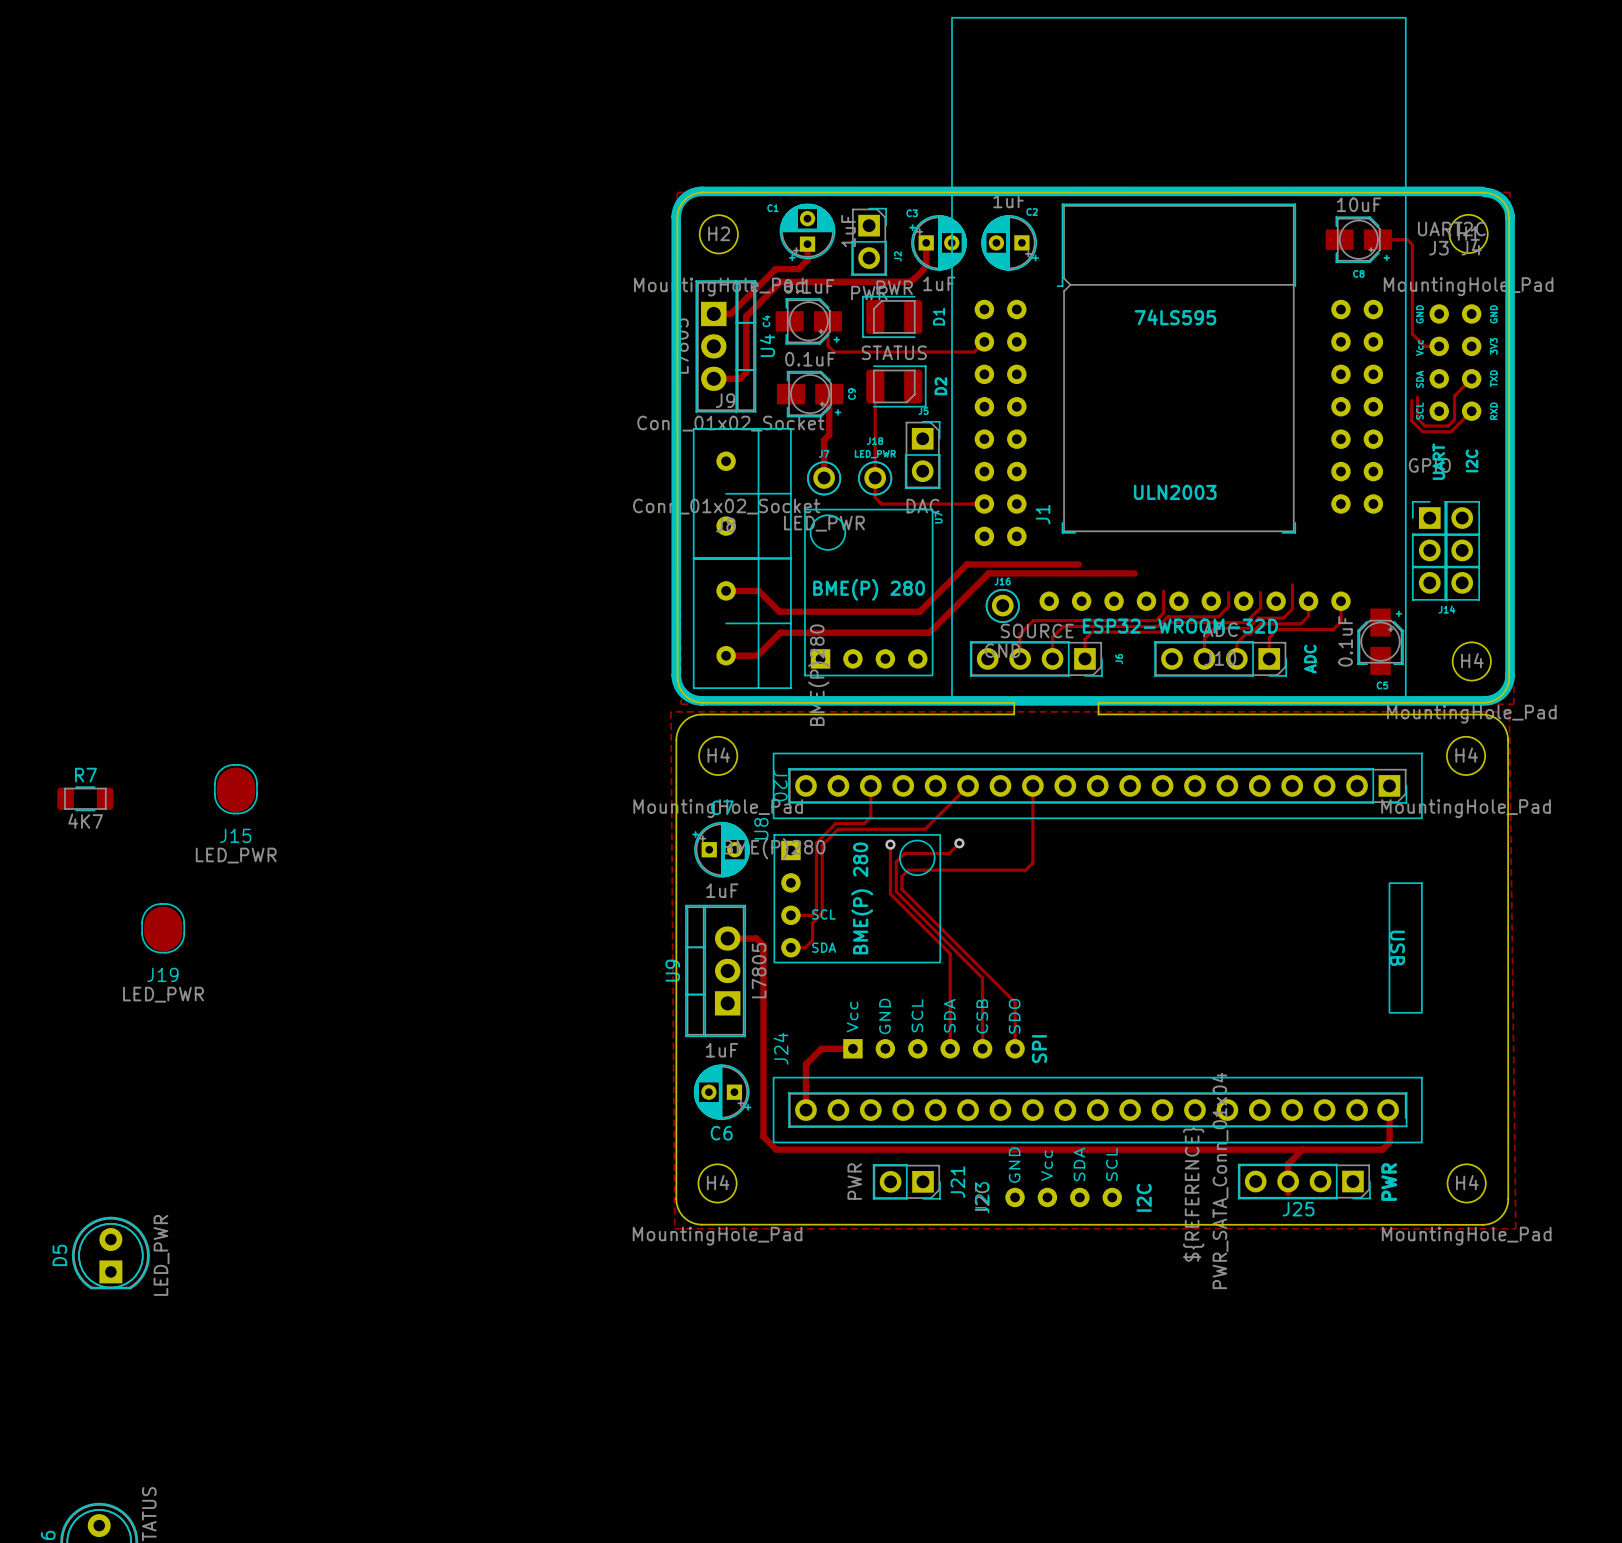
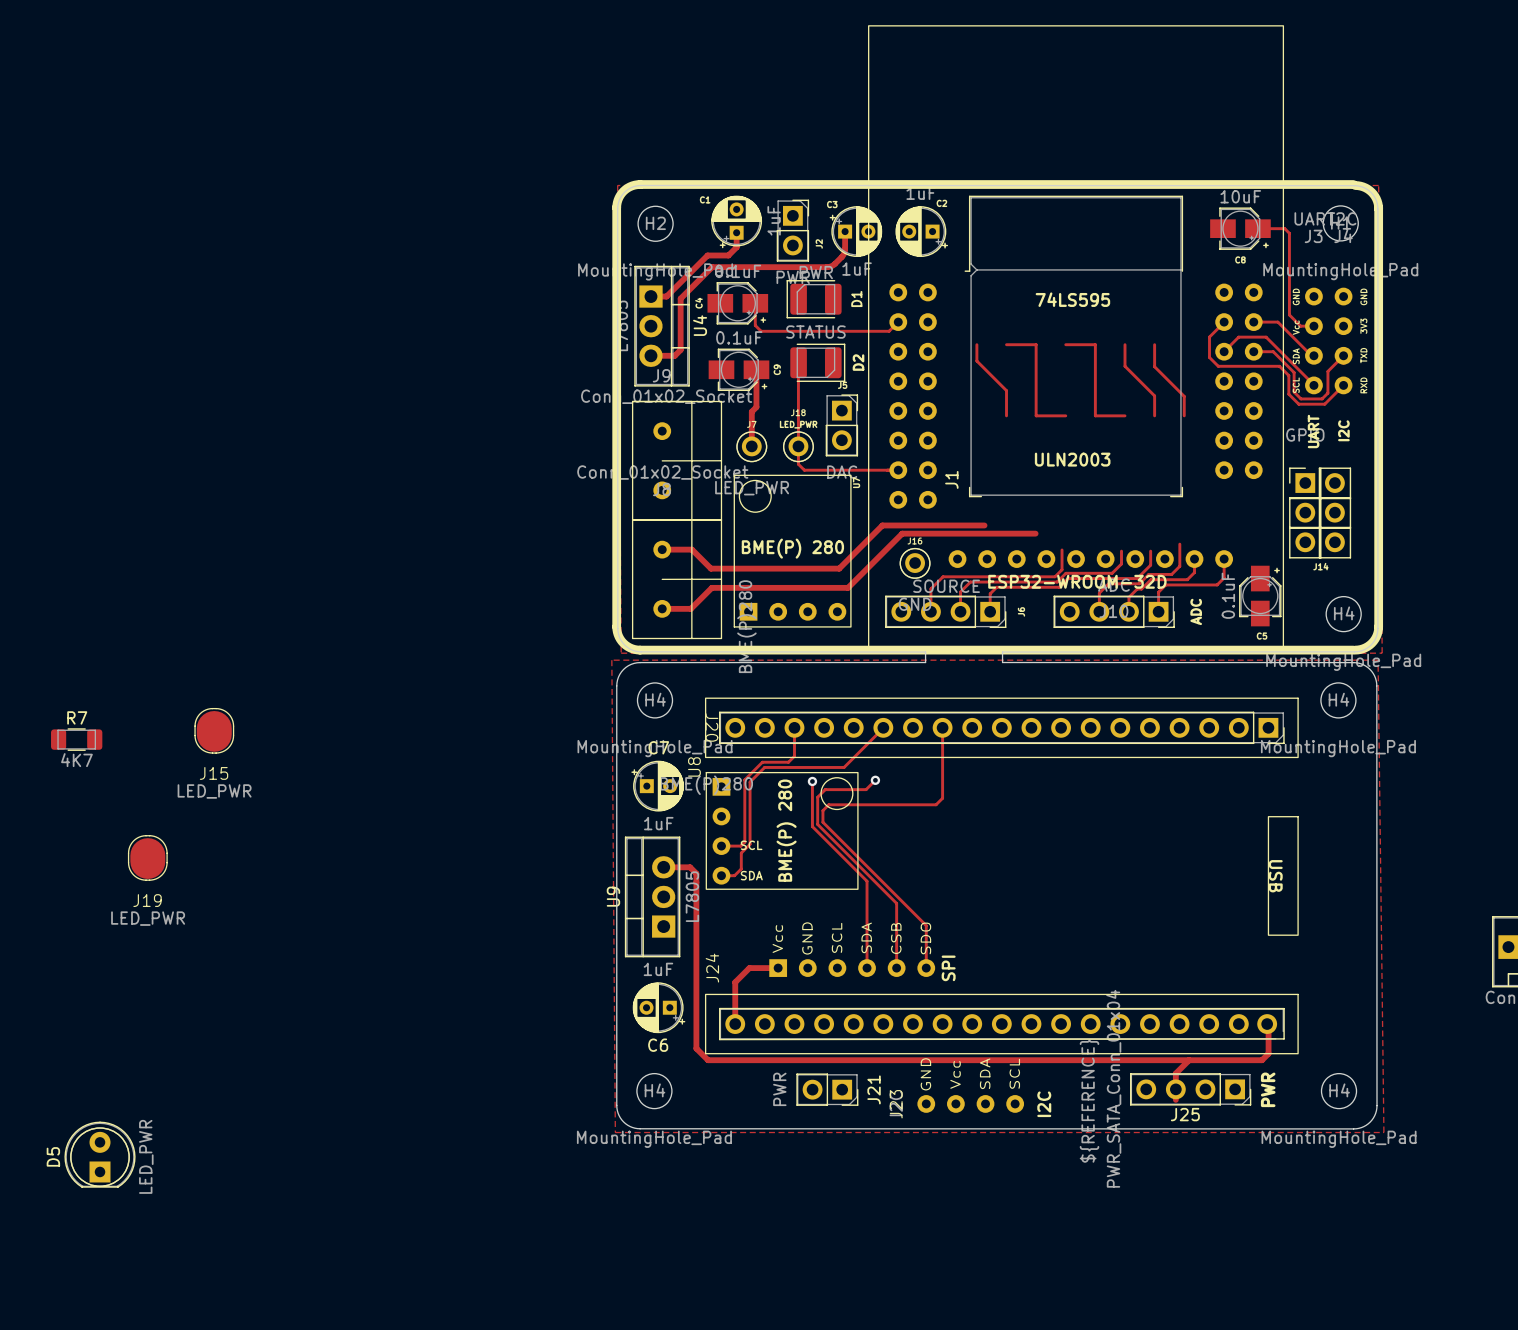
track: none -> (1225, 321) (1209, 337) (1209, 357) (1218, 366) (1279, 366) (1288, 375)
track: none -> (1253, 322) (1277, 322) (1311, 355)
track: none -> (976, 344) (976, 361) (1006, 390) (1006, 415)
track: none -> (1006, 344) (1036, 344) (1036, 415) (1065, 415)
track: none -> (1065, 344) (1095, 344) (1095, 415) (1125, 415)
track: none -> (1125, 344) (1125, 366) (1154, 395) (1154, 415)
track: none -> (1154, 344) (1154, 366) (1184, 396) (1184, 415)
track: none -> (1224, 351) (1238, 337) (1266, 337) (1313, 384)
track: none -> (1253, 351) (1273, 351) (1294, 372)

